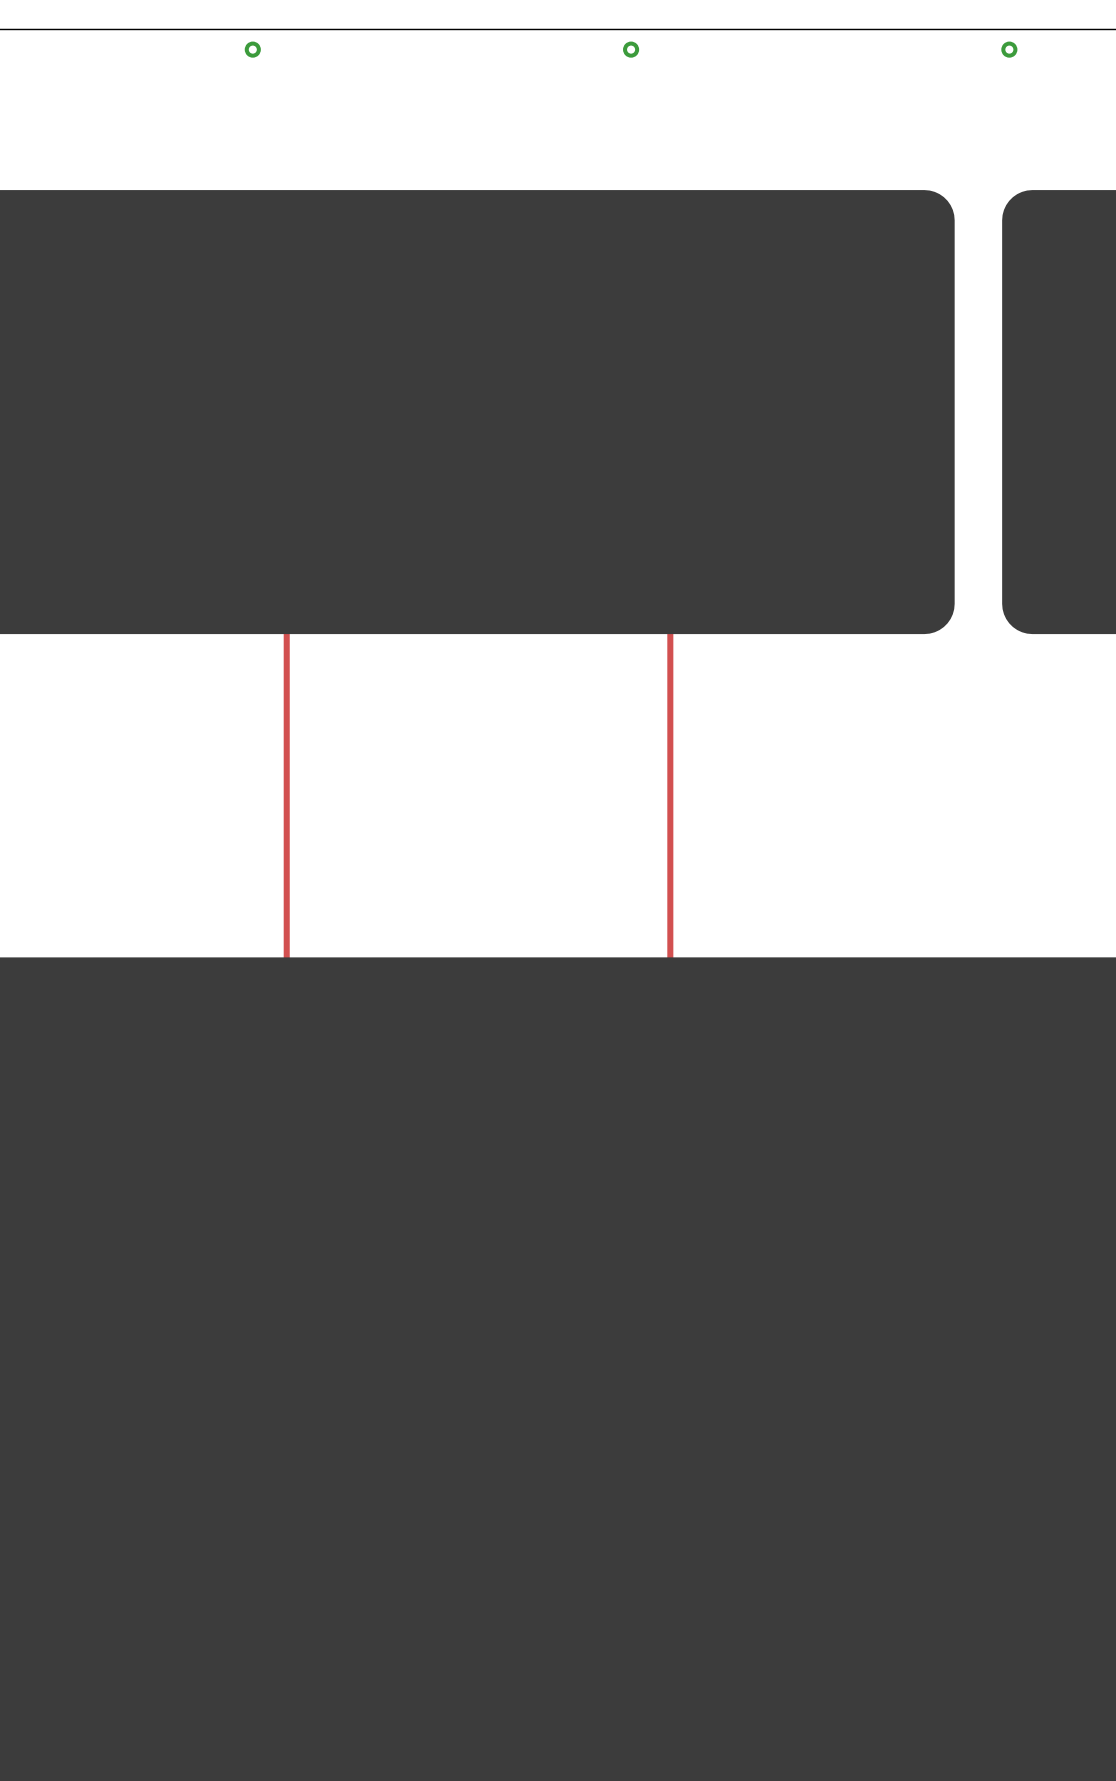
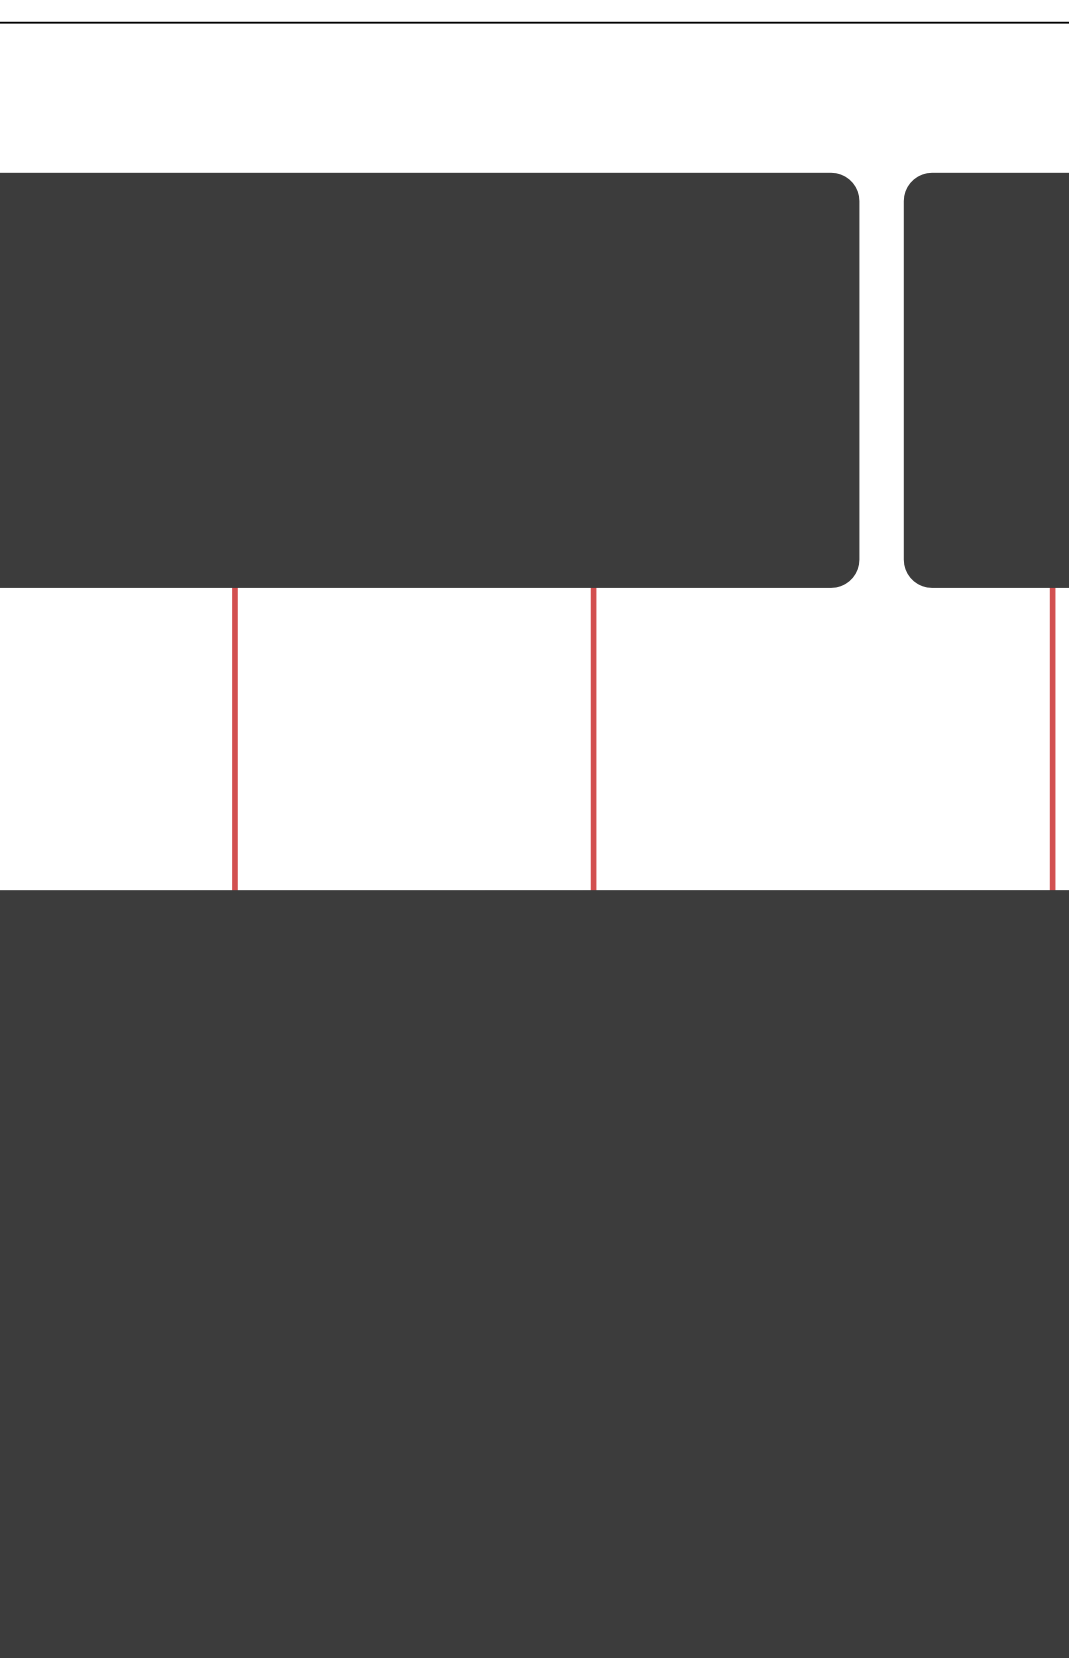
via: (252, 49) -> none
via: (631, 49) -> none
via: (1009, 49) -> none

